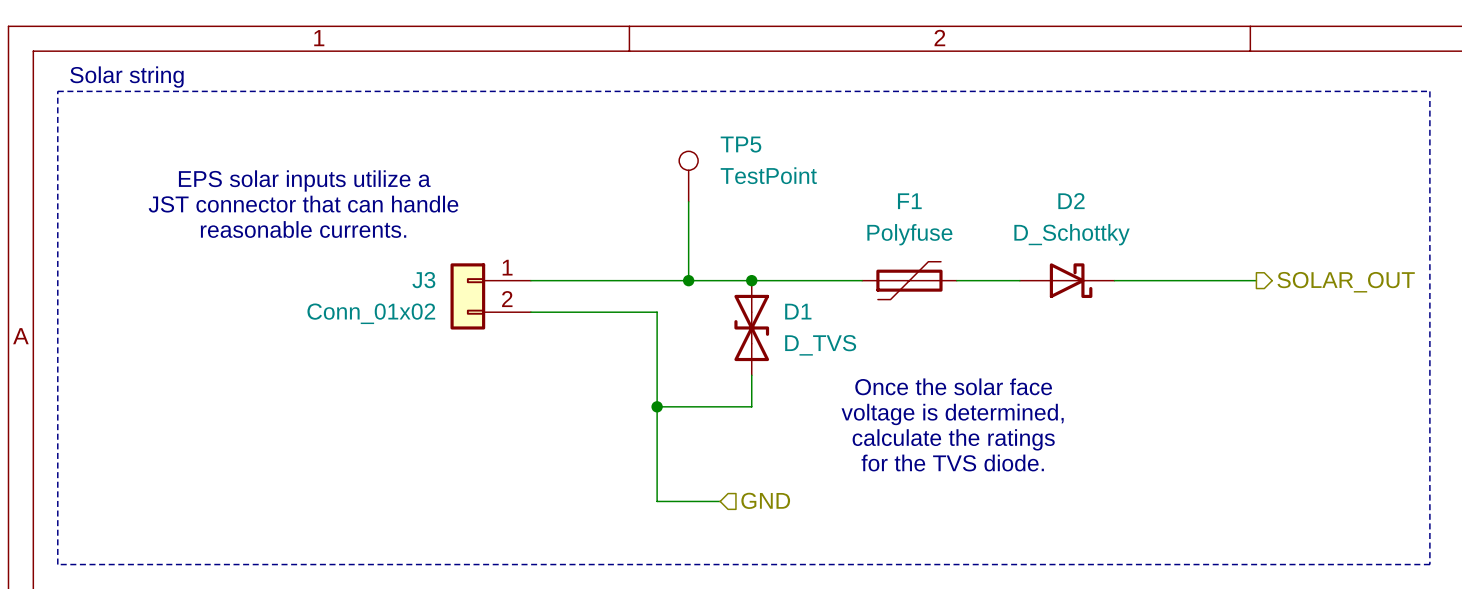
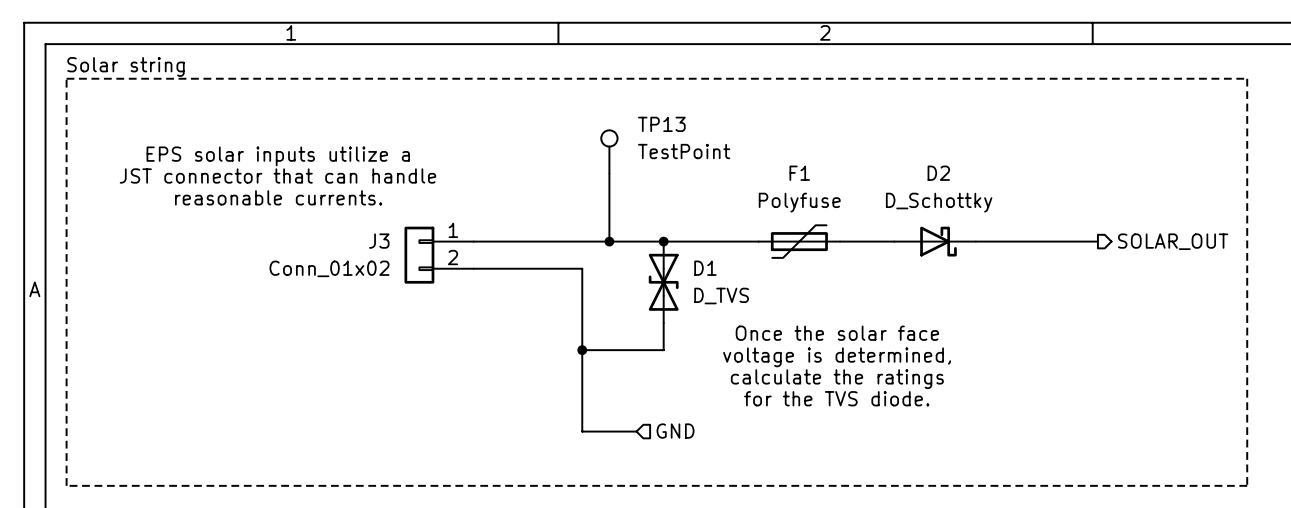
TP5 name: TP5 (740, 144) -> TP13 (661, 124)

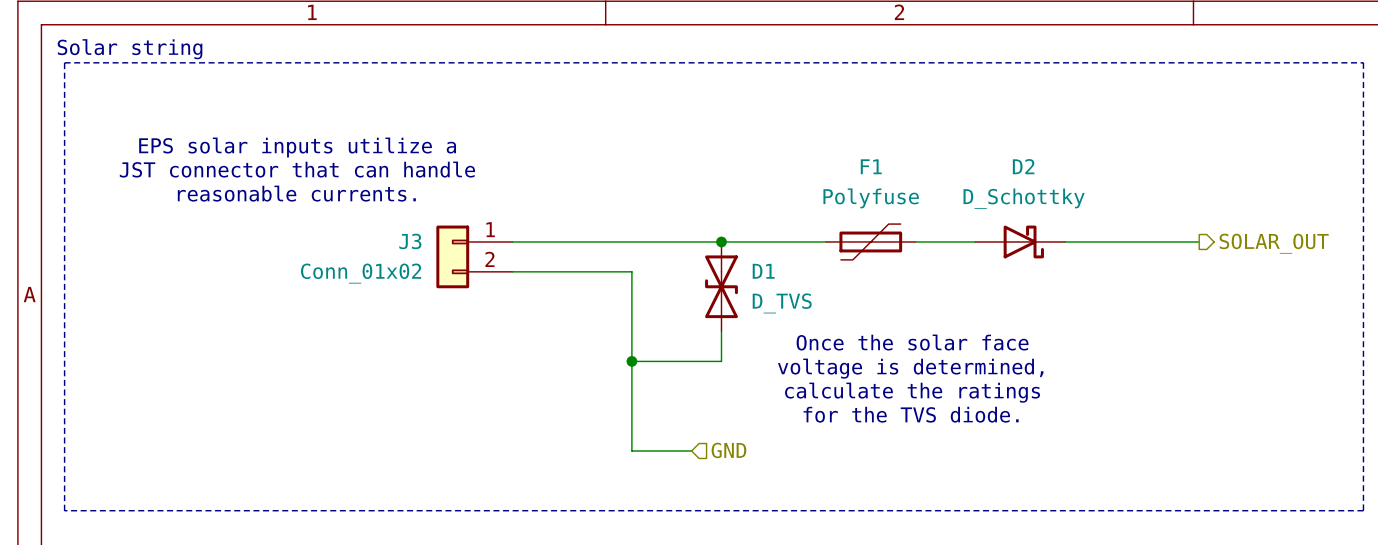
TP13: TestPoint (609, 152) -> none
wire: (609, 173) (609, 241) -> none
junction: (609, 241) -> none

